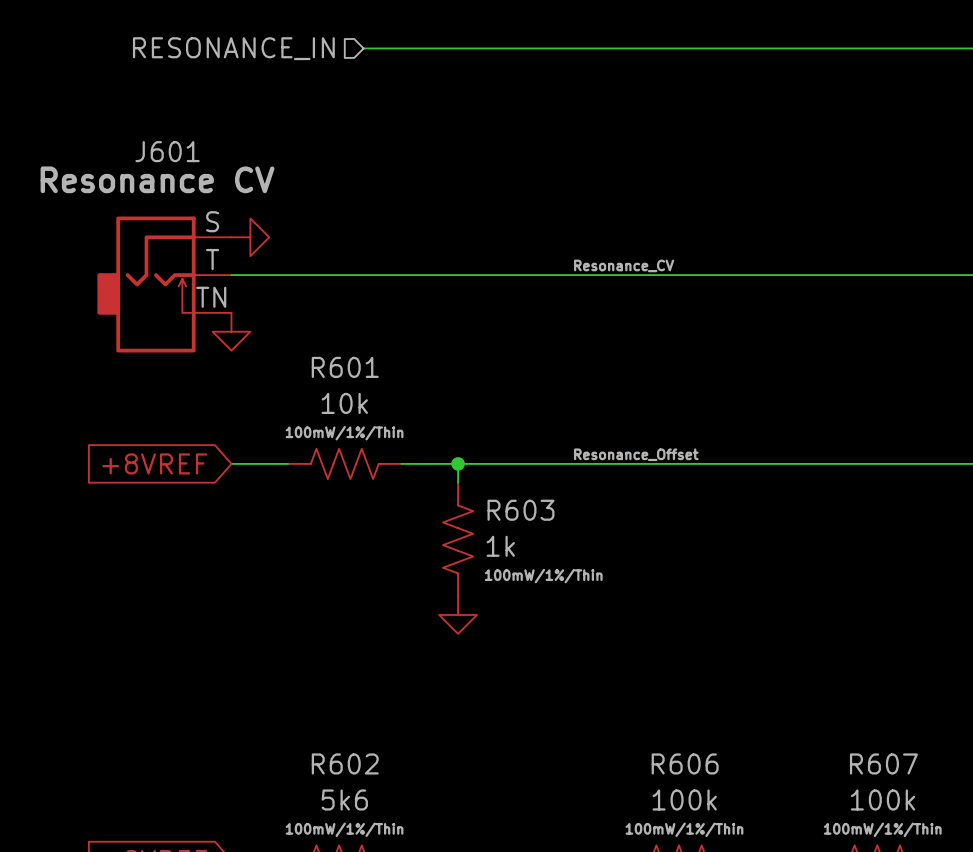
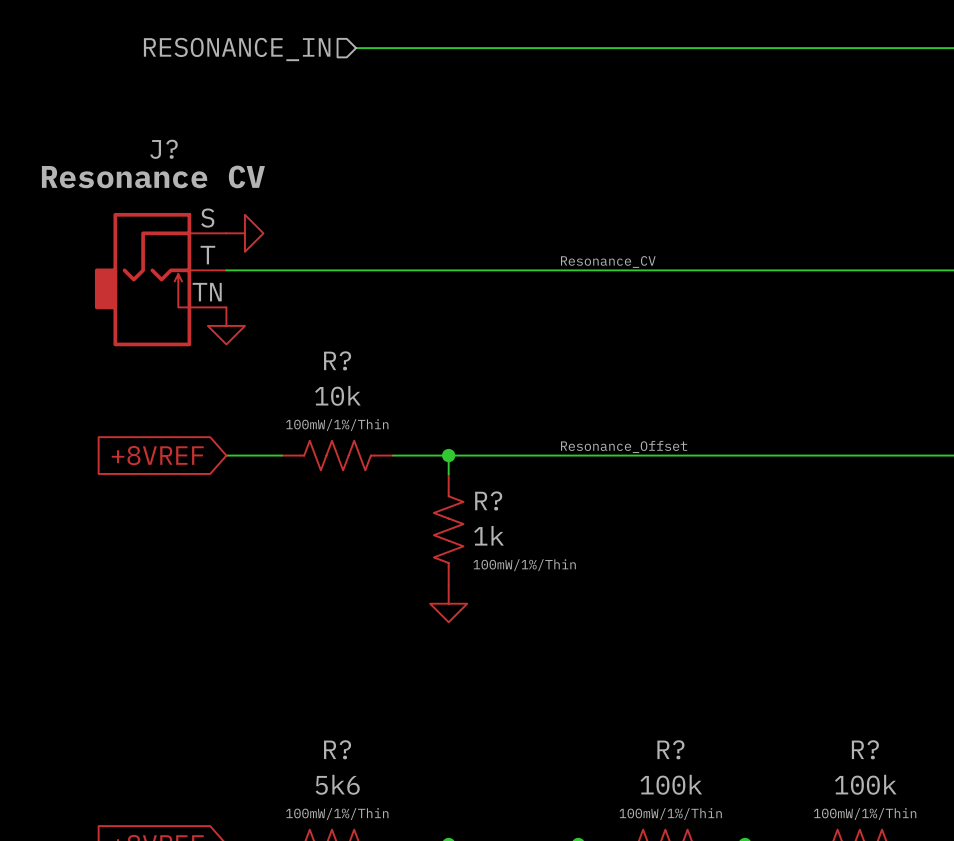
J601 name: J601 (167, 151) -> J? (163, 149)
R601 name: R601 (345, 367) -> R? (337, 360)
R603 name: R603 (520, 510) -> R? (488, 500)
R602 name: R602 (345, 763) -> R? (337, 749)
R606 name: R606 (685, 763) -> R? (670, 749)
R607 name: R607 (883, 763) -> R? (865, 749)

